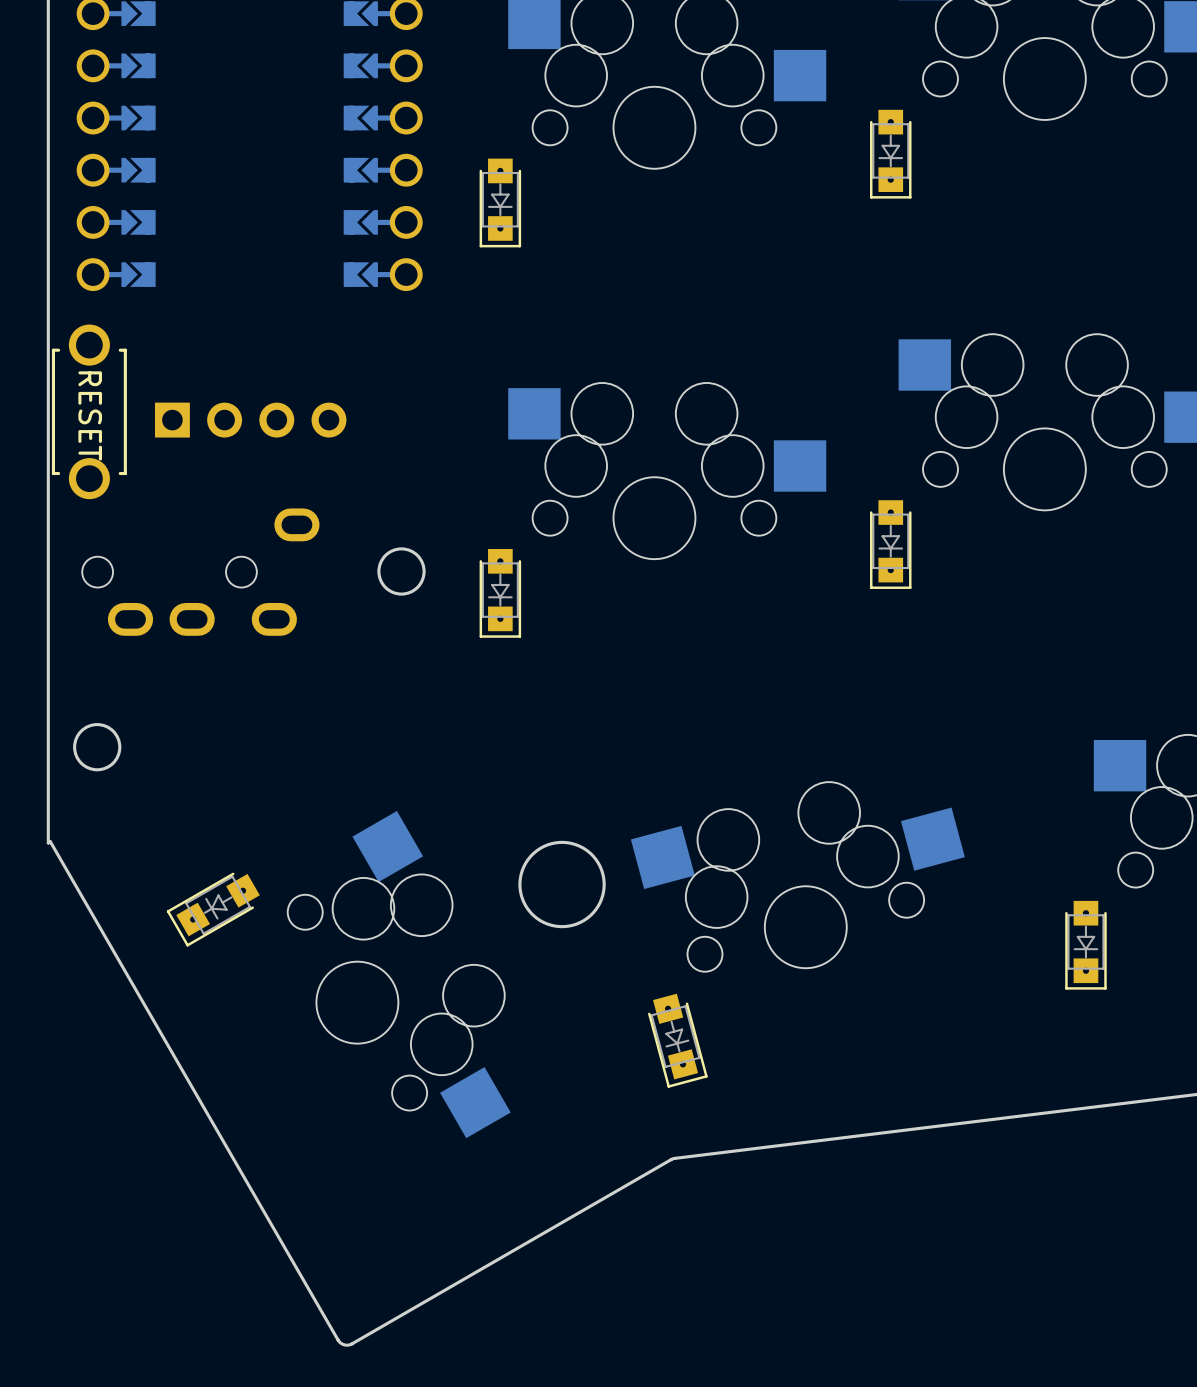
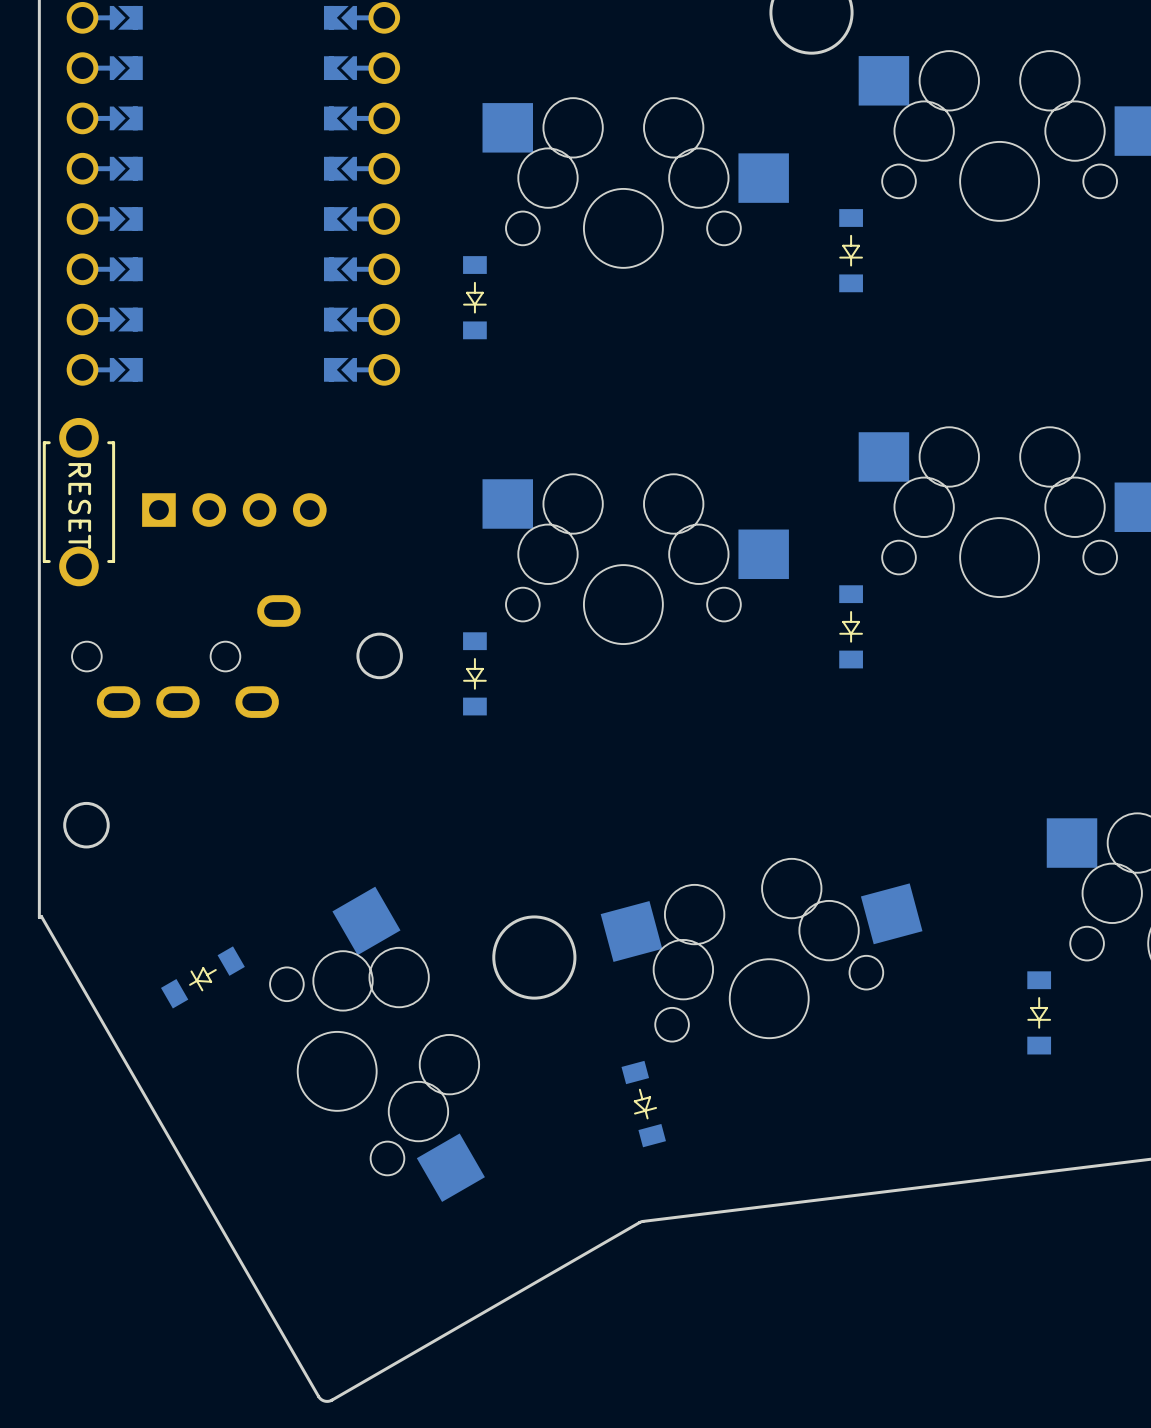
part footprint: [870, 109, 912, 199] -> [839, 209, 863, 293]
part footprint: [479, 158, 522, 248] -> [463, 256, 487, 340]
part footprint: [870, 500, 912, 589] -> [839, 585, 863, 669]
part footprint: [479, 549, 522, 638] -> [463, 632, 487, 716]
part footprint: [166, 872, 260, 947] -> [160, 946, 245, 1009]
part footprint: [1065, 900, 1107, 990] -> [1027, 971, 1052, 1055]
part footprint: [648, 993, 708, 1088] -> [621, 1060, 666, 1148]

